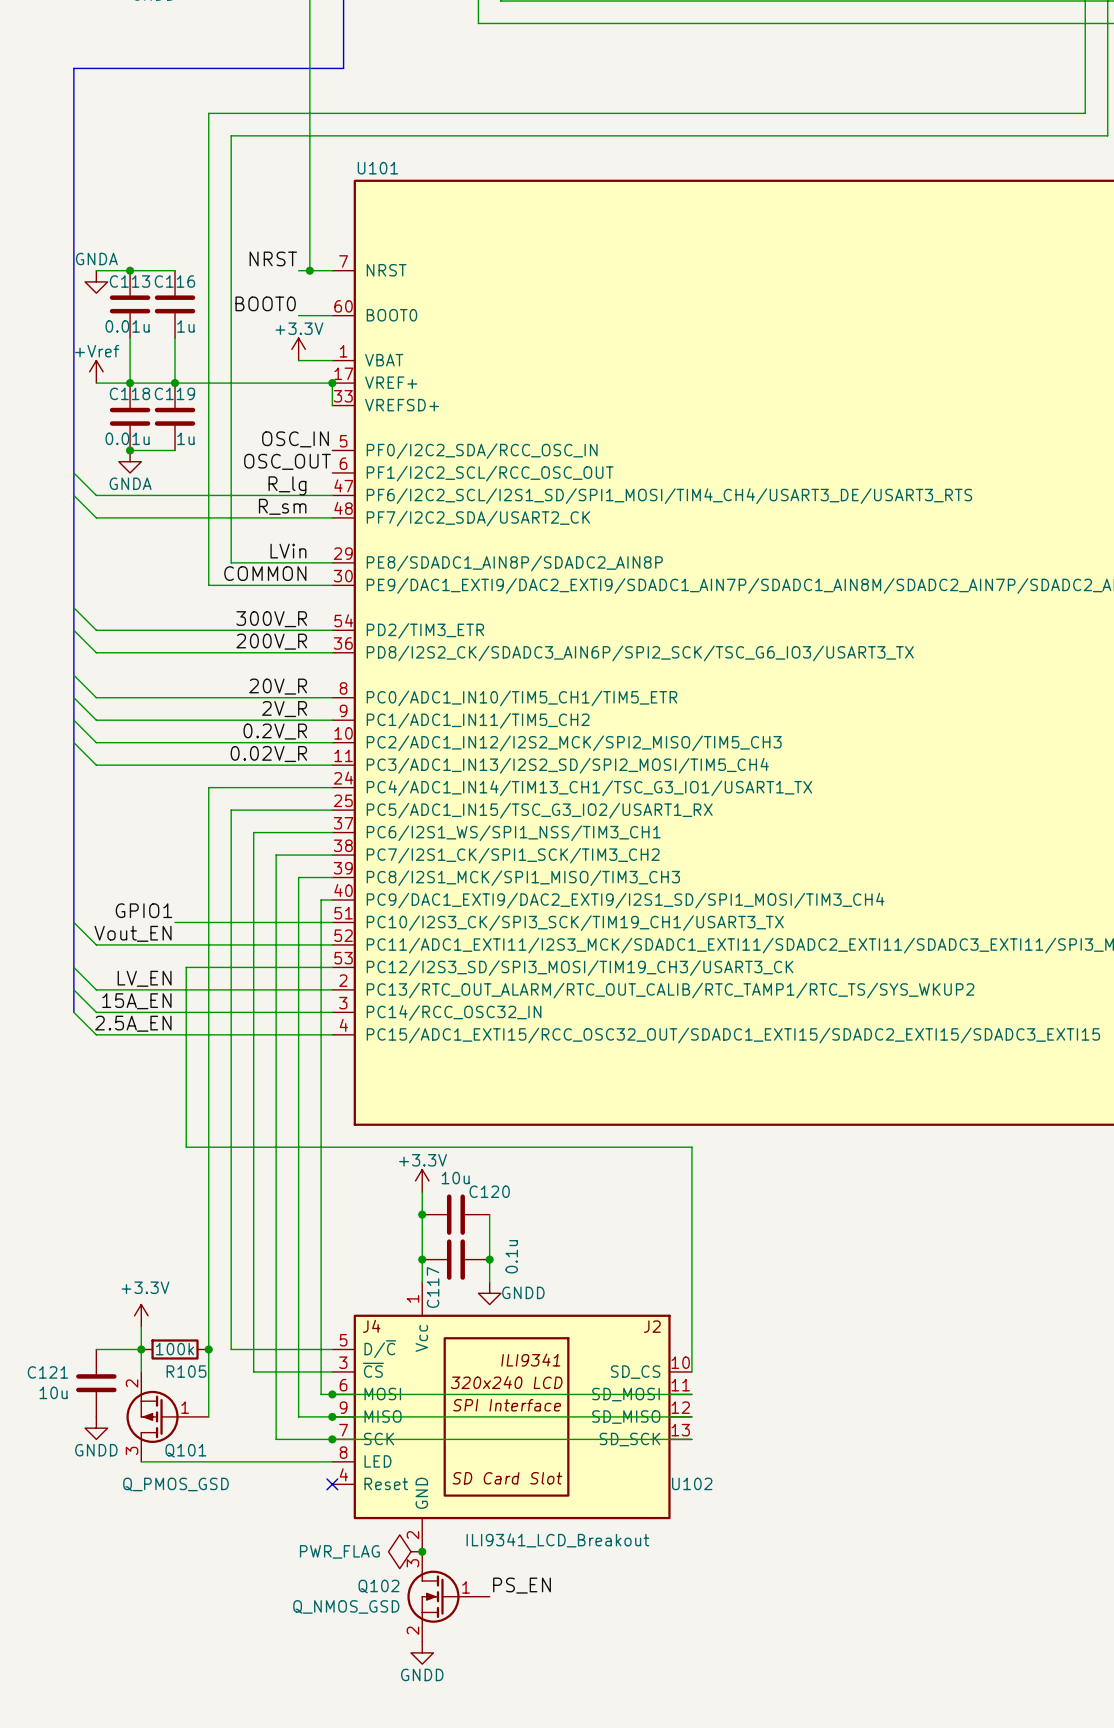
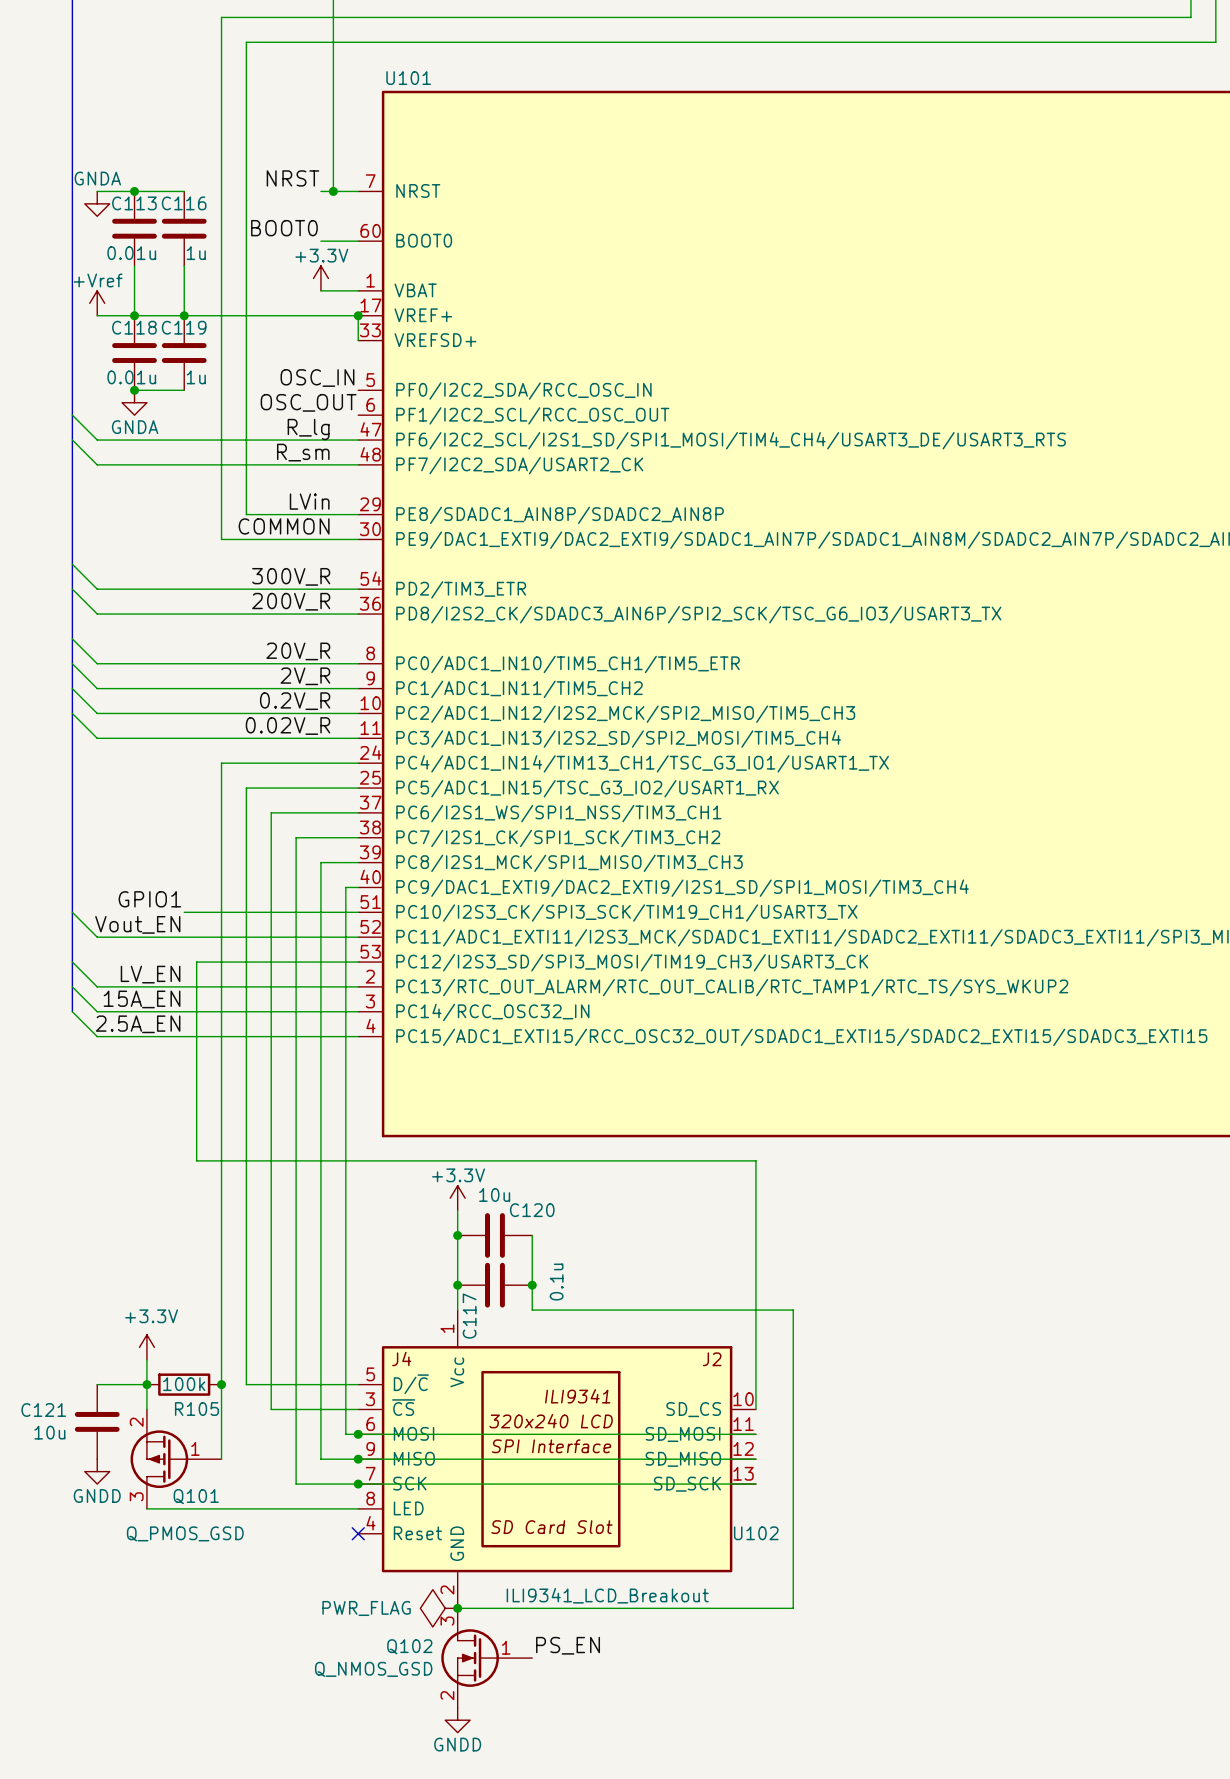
wire: none -> (532, 1310) (793, 1310) (793, 1608) (457, 1608)
power symbol: GNDD (489, 1293) -> none

